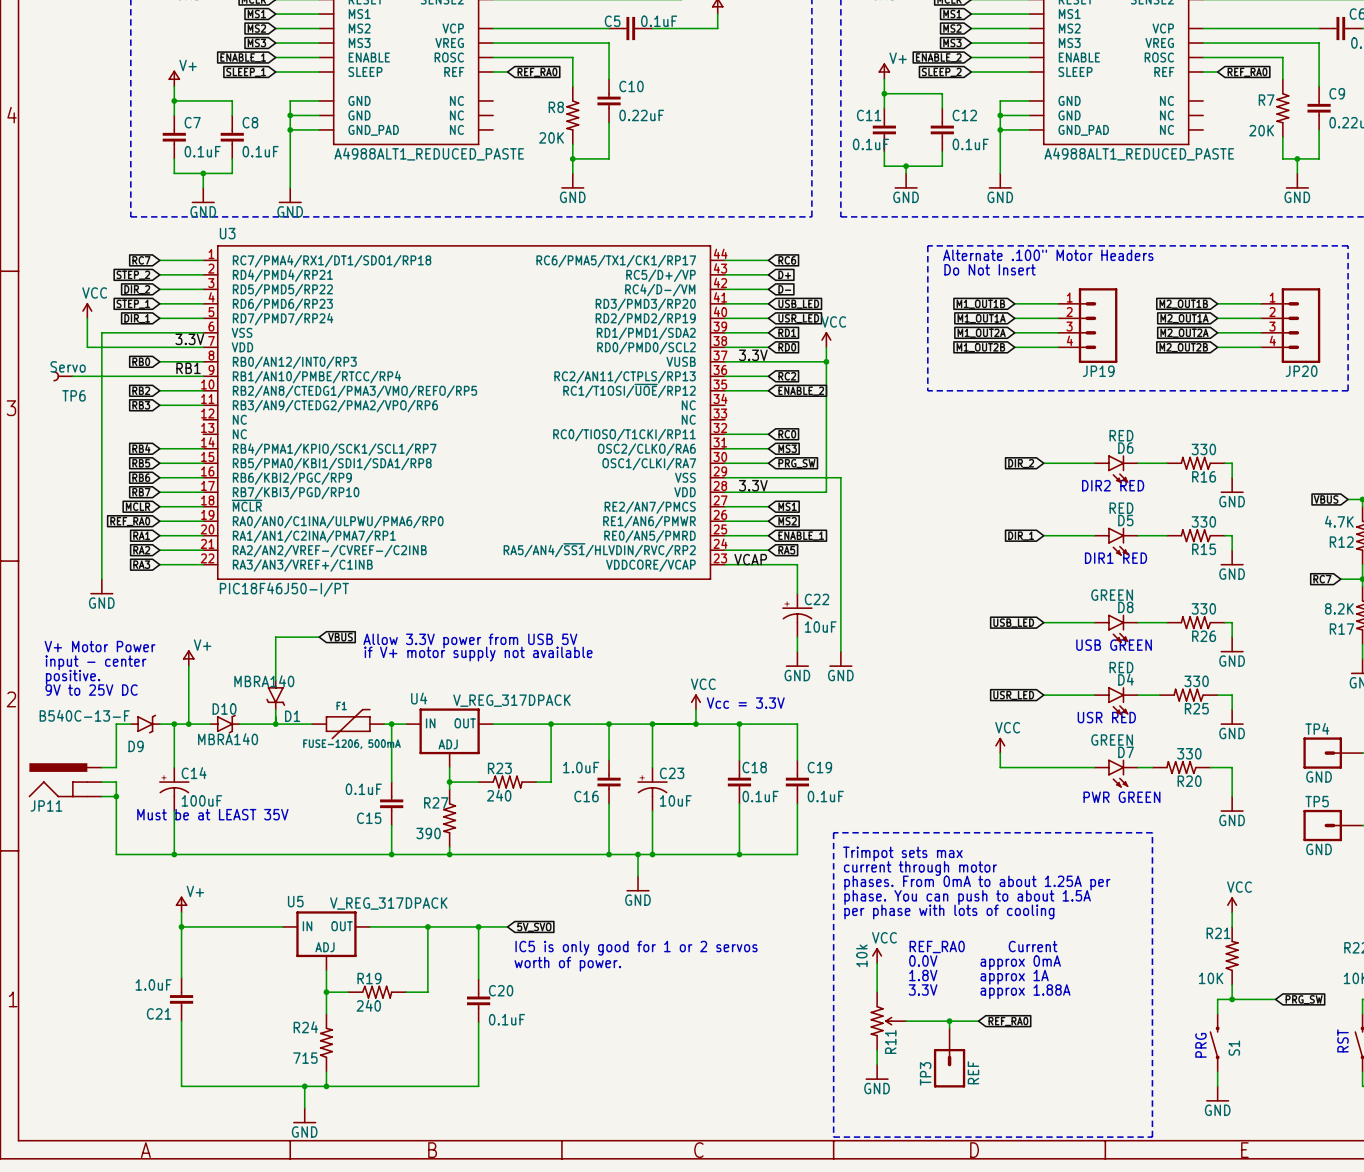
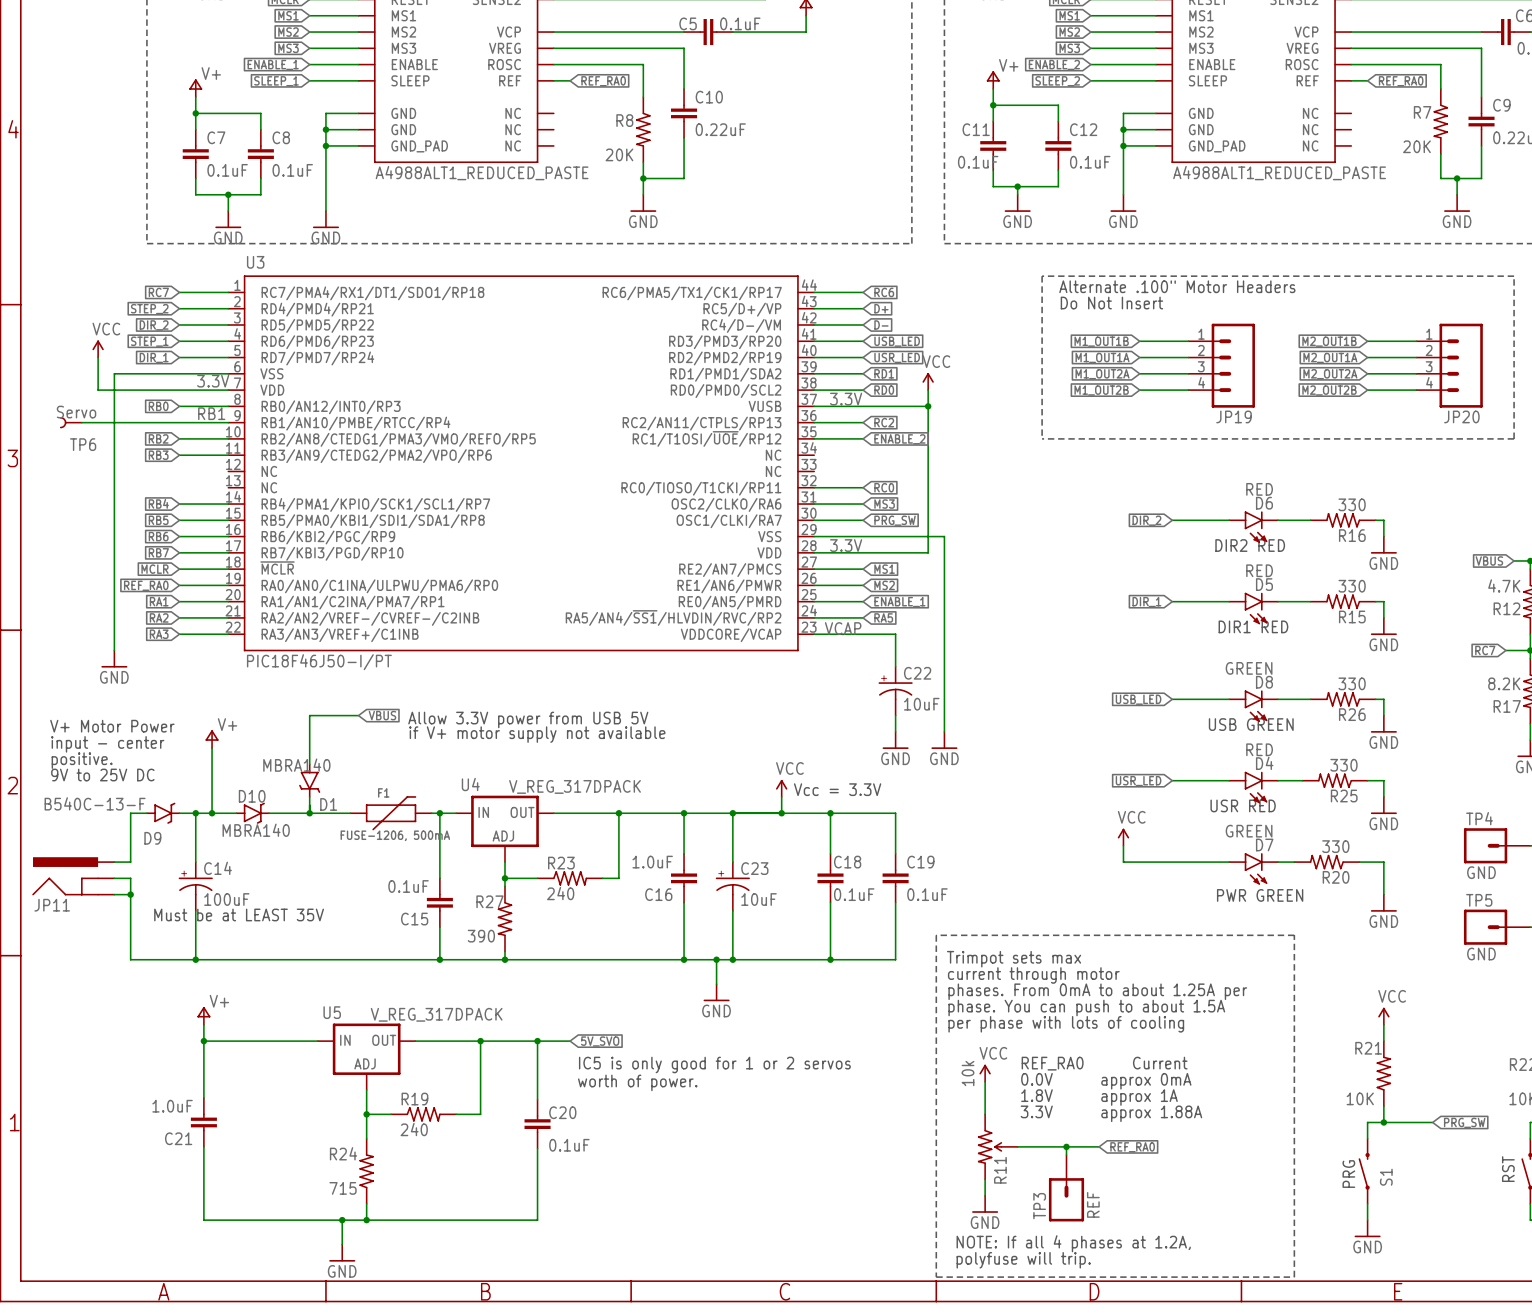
text: none -> NOTE: If all 4 phases at 1.2A, (1073, 1243)
text: none -> polyfuse will trip. (1023, 1260)

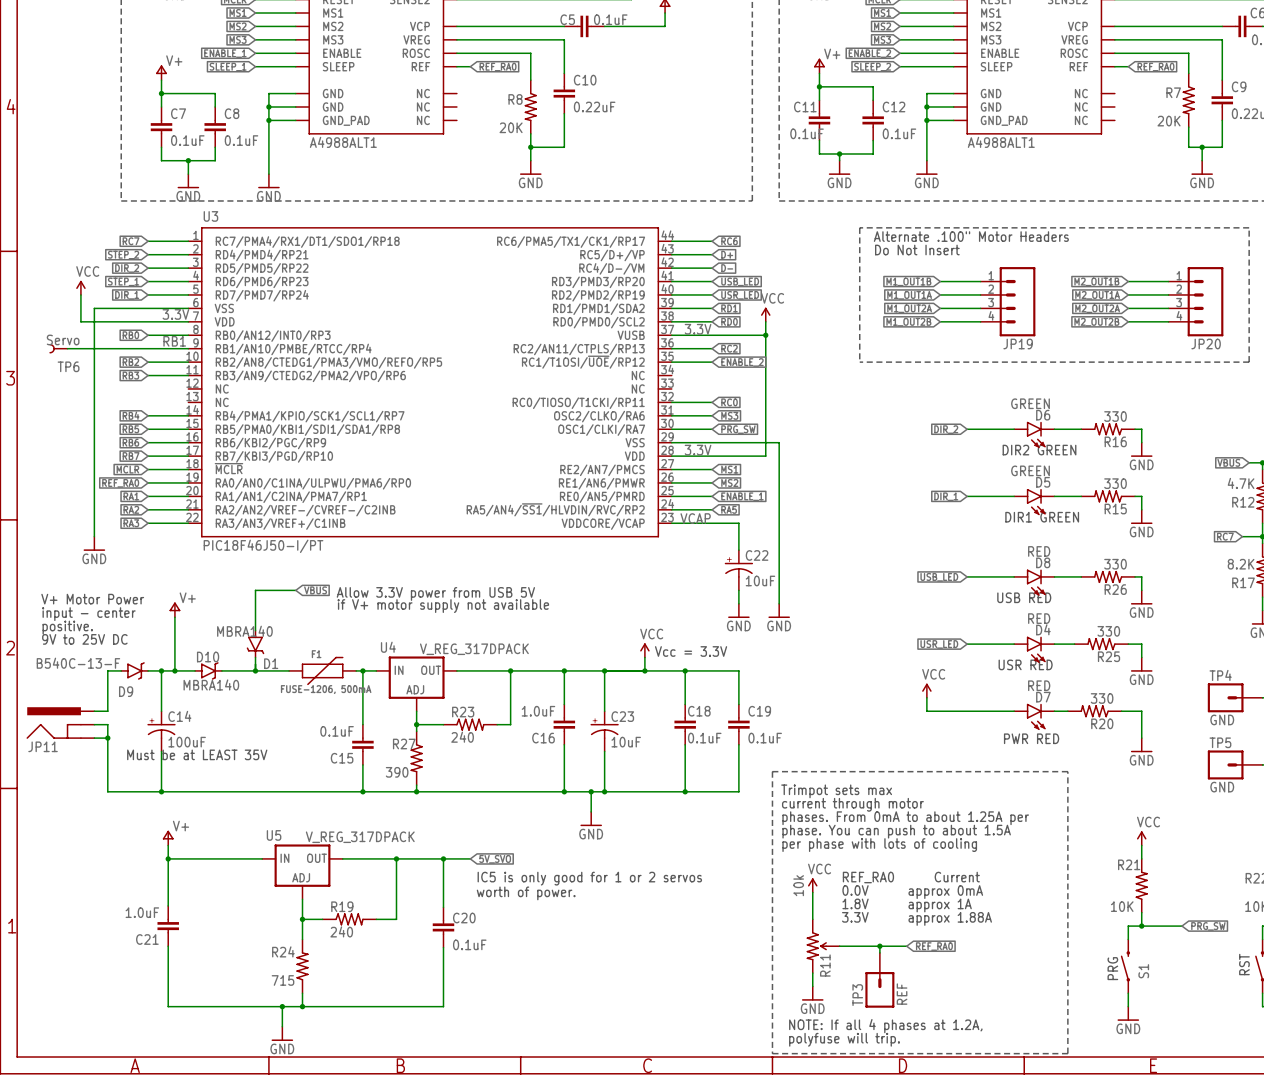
part value: A4988ALT1_REDUCED_PASTE (482, 173) -> A4988ALT1 (343, 142)
part value: A4988ALT1_REDUCED_PASTE (1279, 173) -> A4988ALT1 (1001, 142)
D6 value: RED (1259, 489) -> GREEN (1030, 403)
text: DIR2 RED (1250, 545) -> DIR2 GREEN (1039, 450)
D5 value: RED (1259, 570) -> GREEN (1030, 470)
text: DIR1 RED (1253, 626) -> DIR1 GREEN (1042, 517)
D8 value: GREEN (1249, 668) -> RED (1039, 551)
text: USB GREEN (1251, 724) -> USB RED (1024, 597)
D7 value: GREEN (1249, 831) -> RED (1039, 685)
text: PWR GREEN (1260, 895) -> PWR RED (1031, 738)

